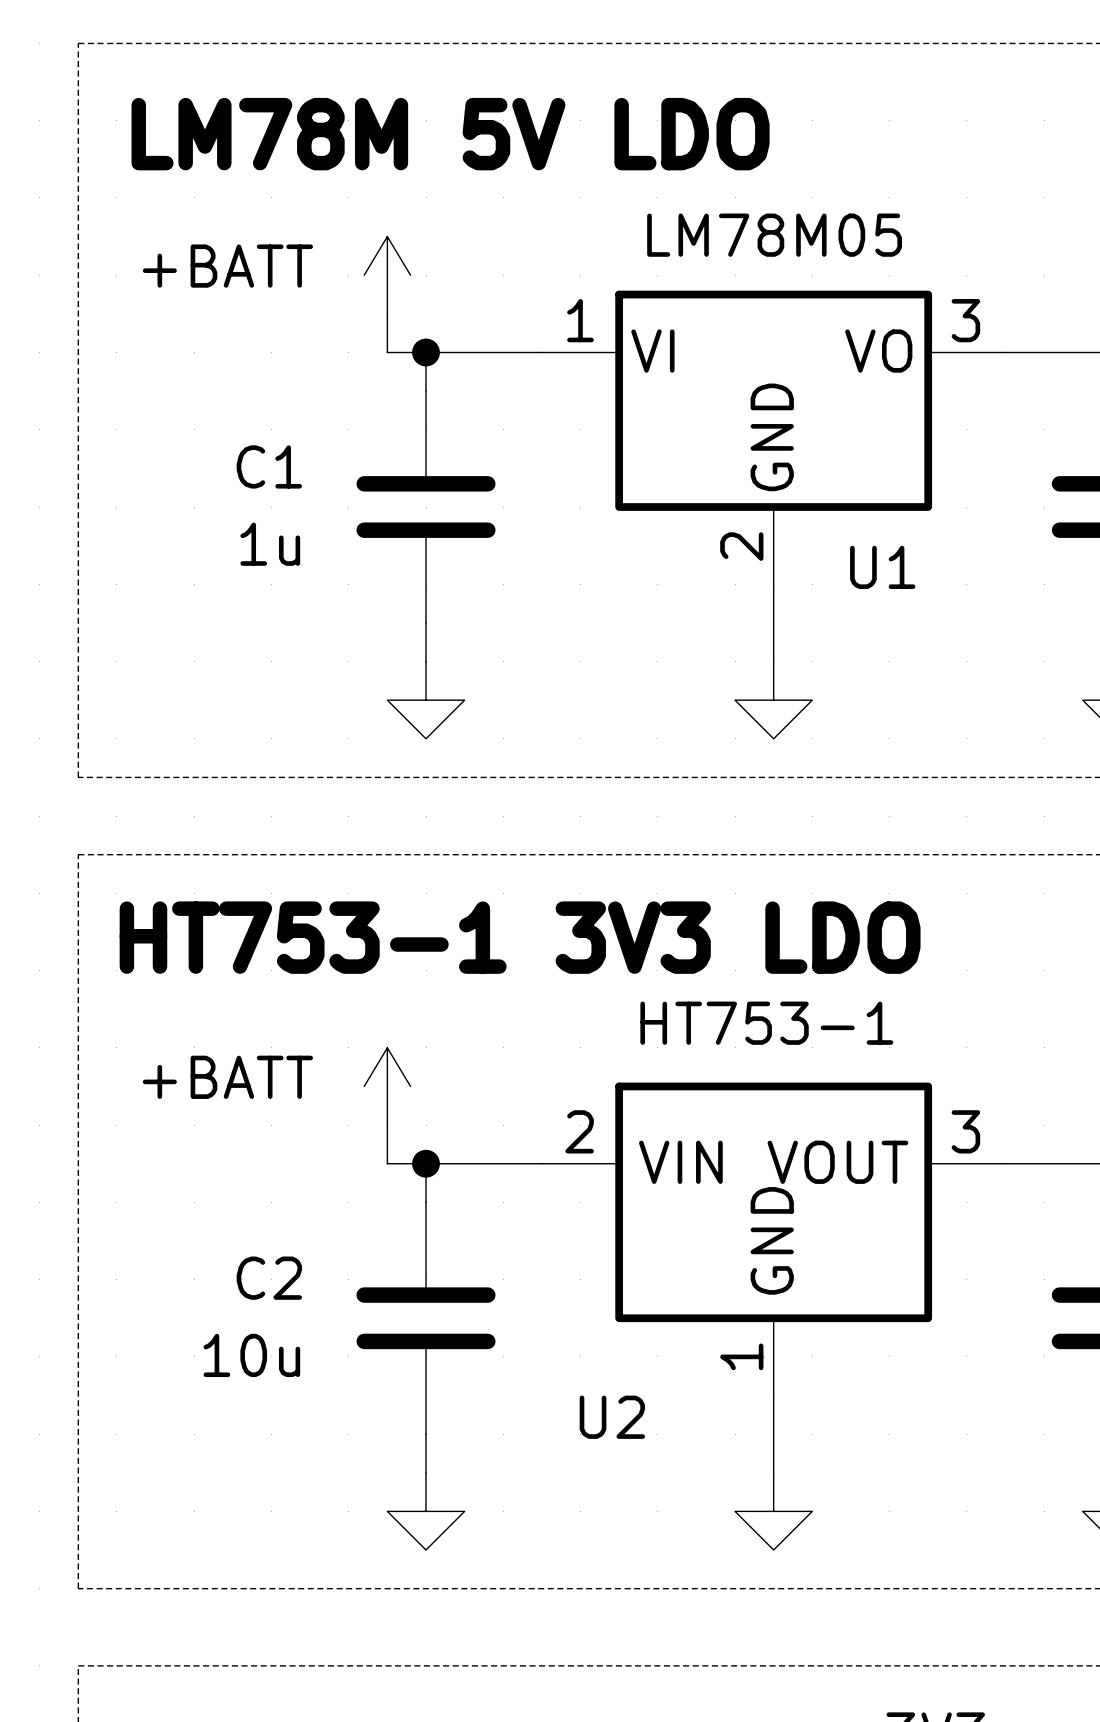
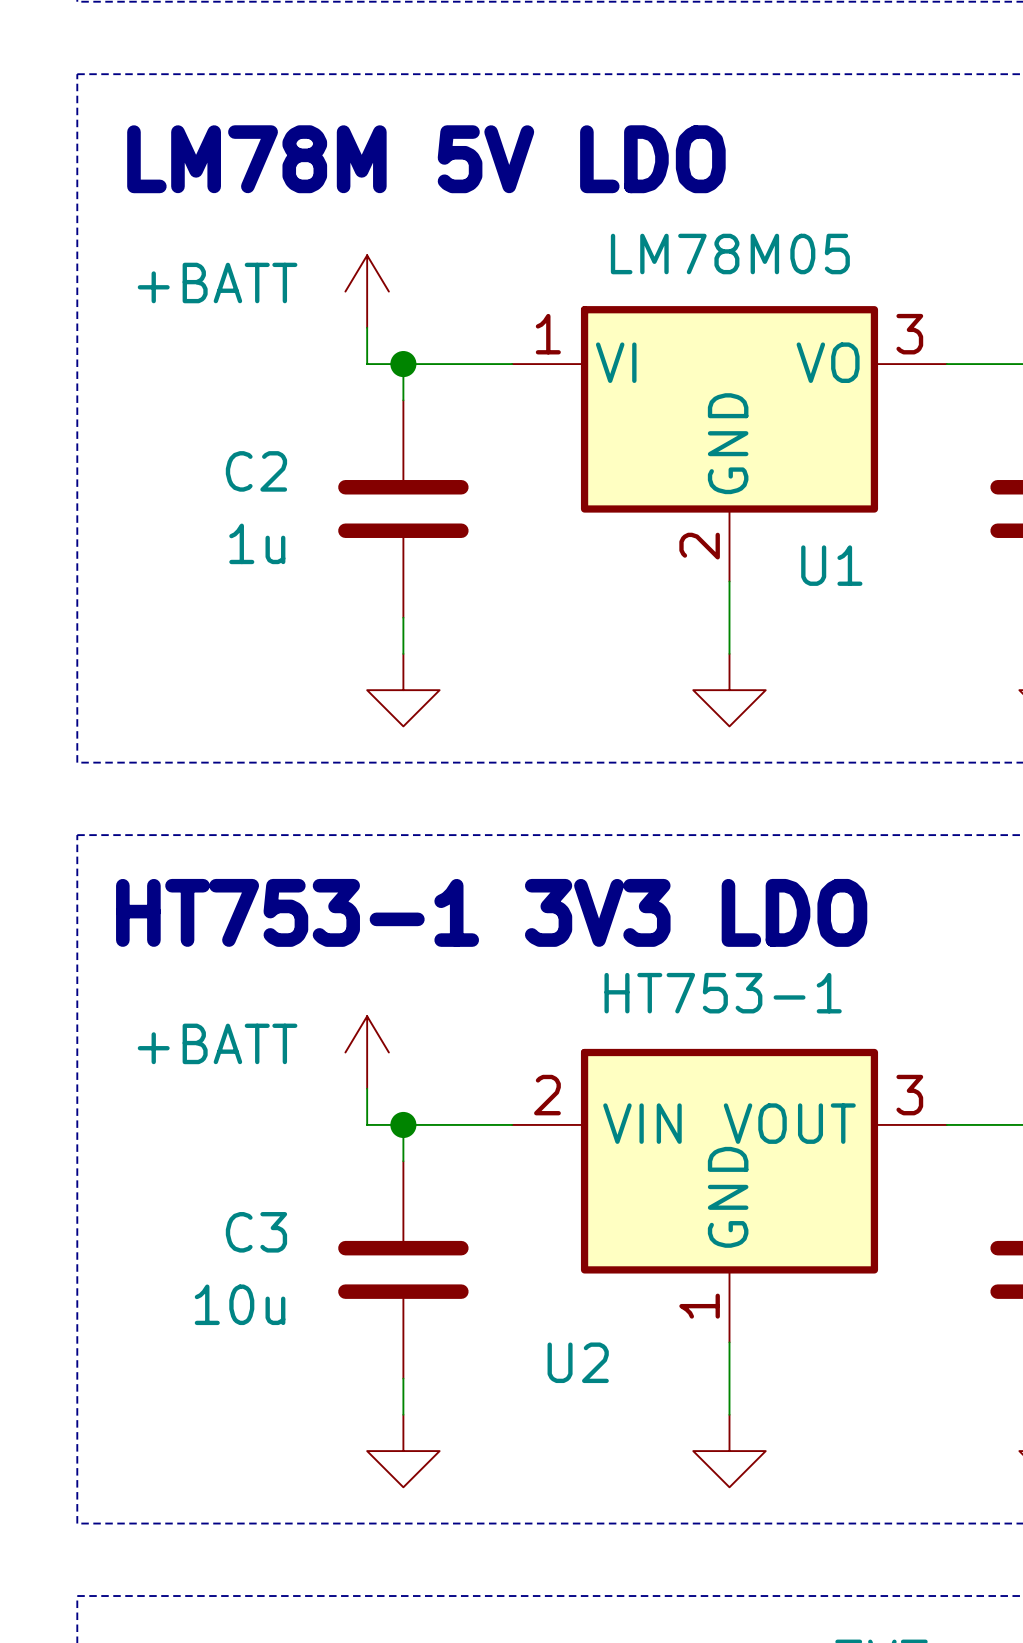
C1 name: C1 (269, 466) -> C2 (256, 471)
C2 name: C2 (269, 1278) -> C3 (256, 1232)

